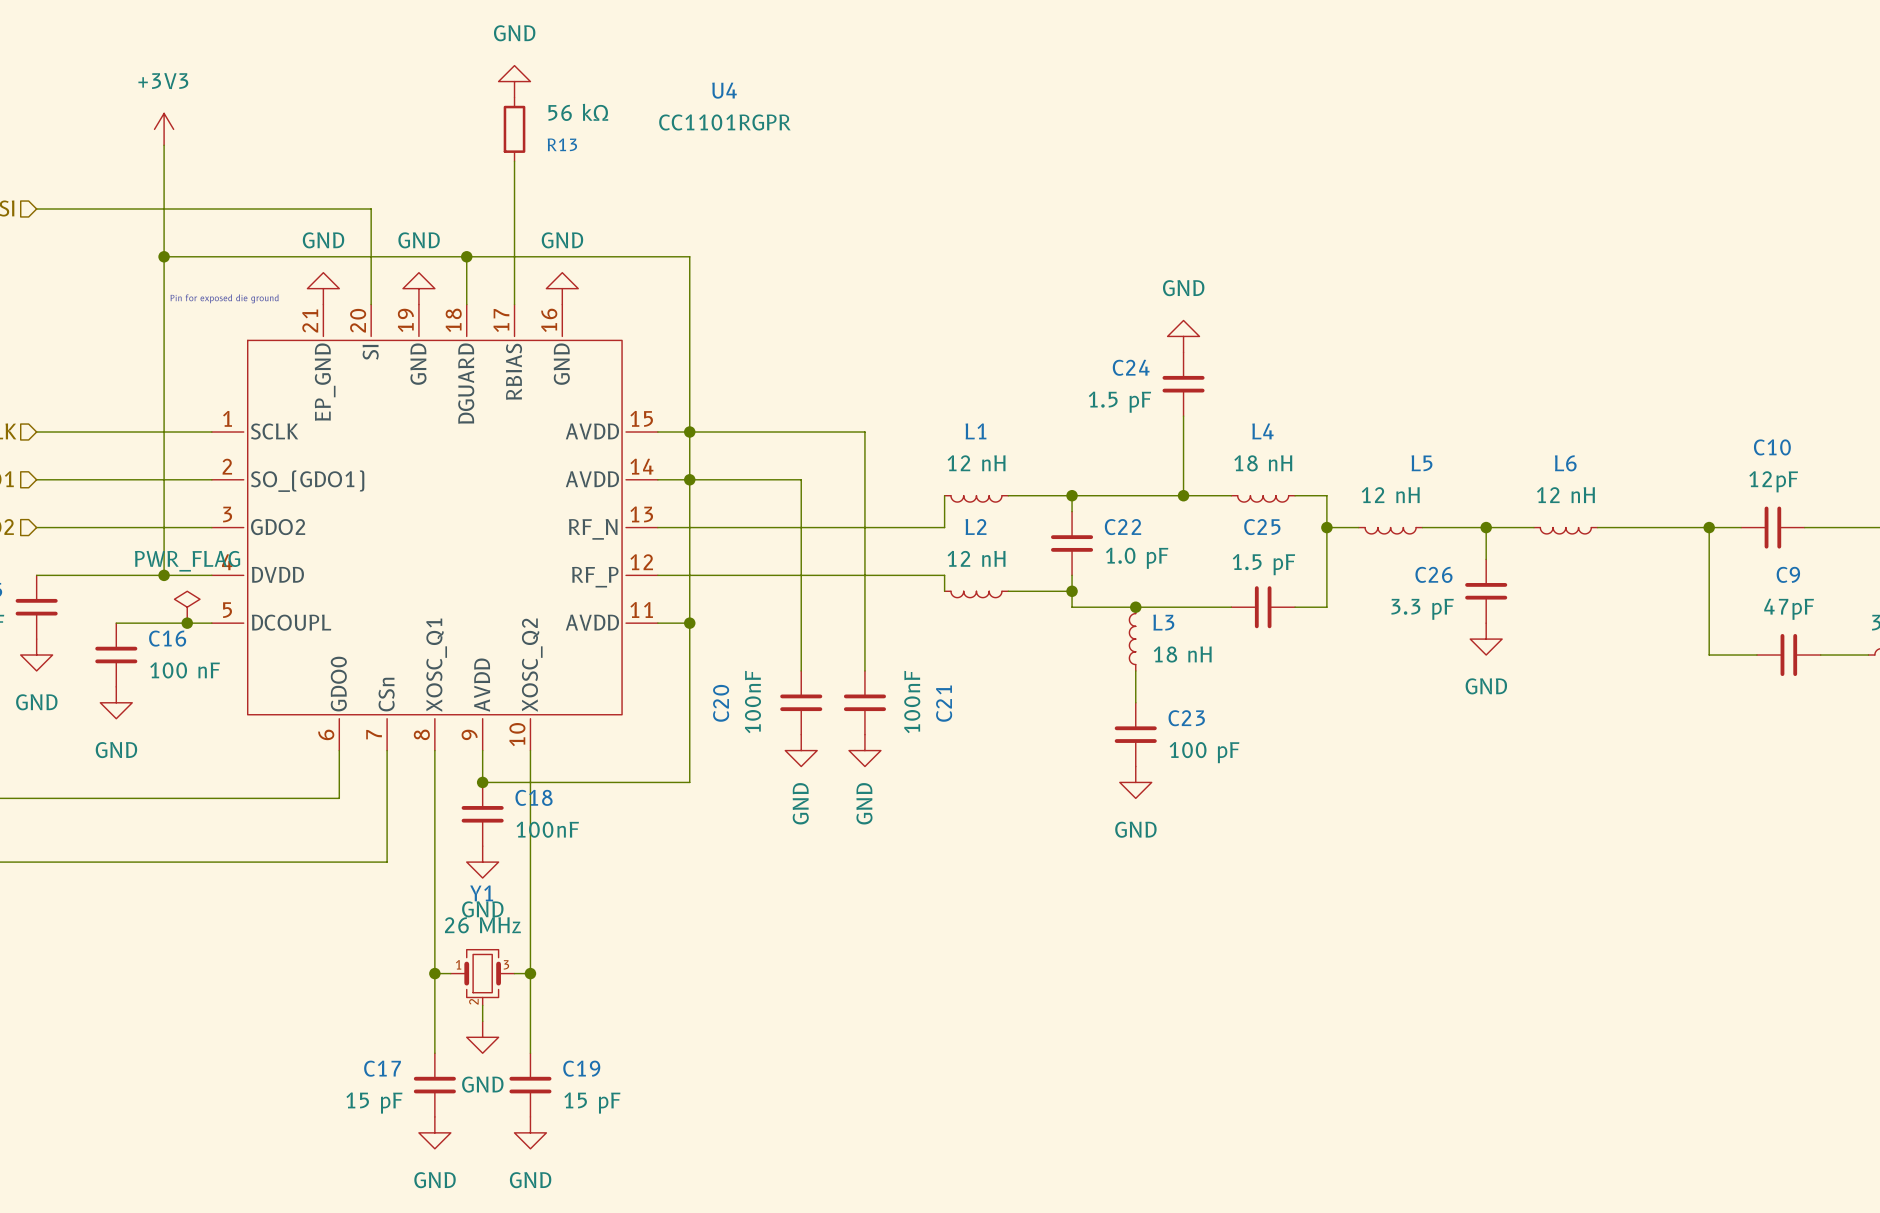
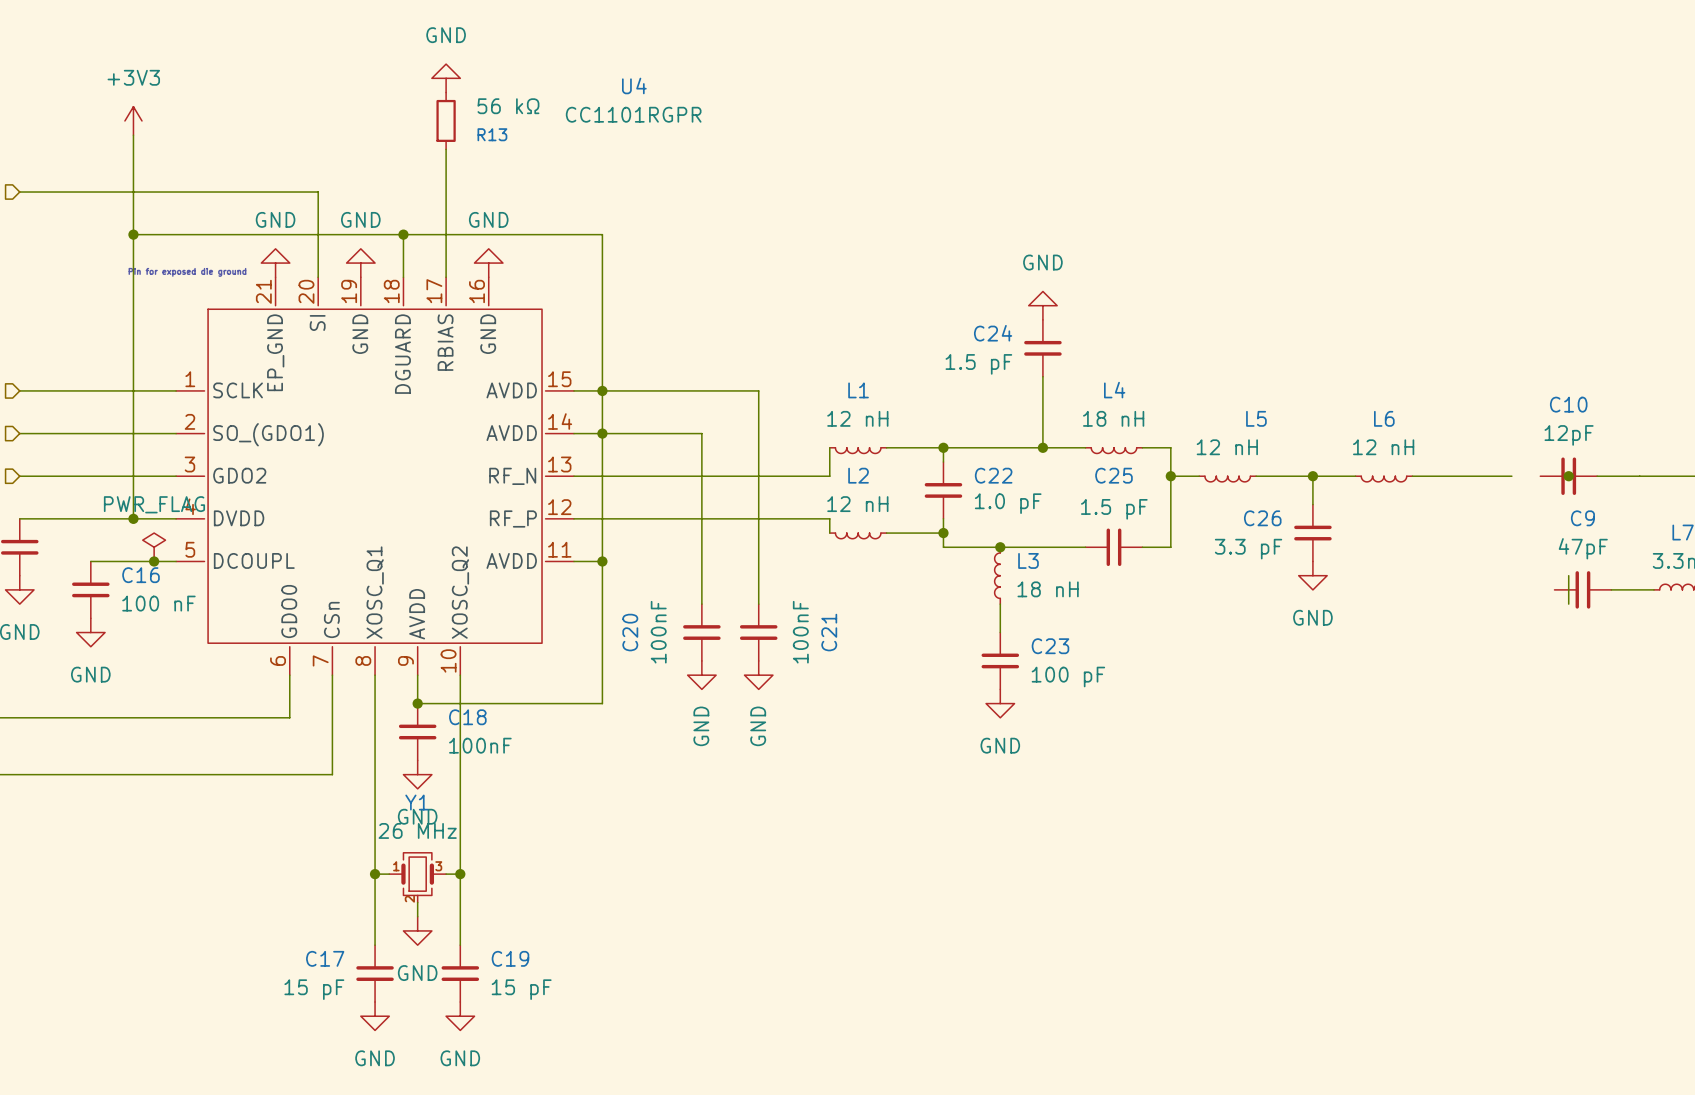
junction position: (1709, 527) -> (1568, 476)
wire: (1741, 527) (1709, 527) (1709, 655) (1756, 655) -> none
wire: none -> (1568, 575) (1568, 604)

